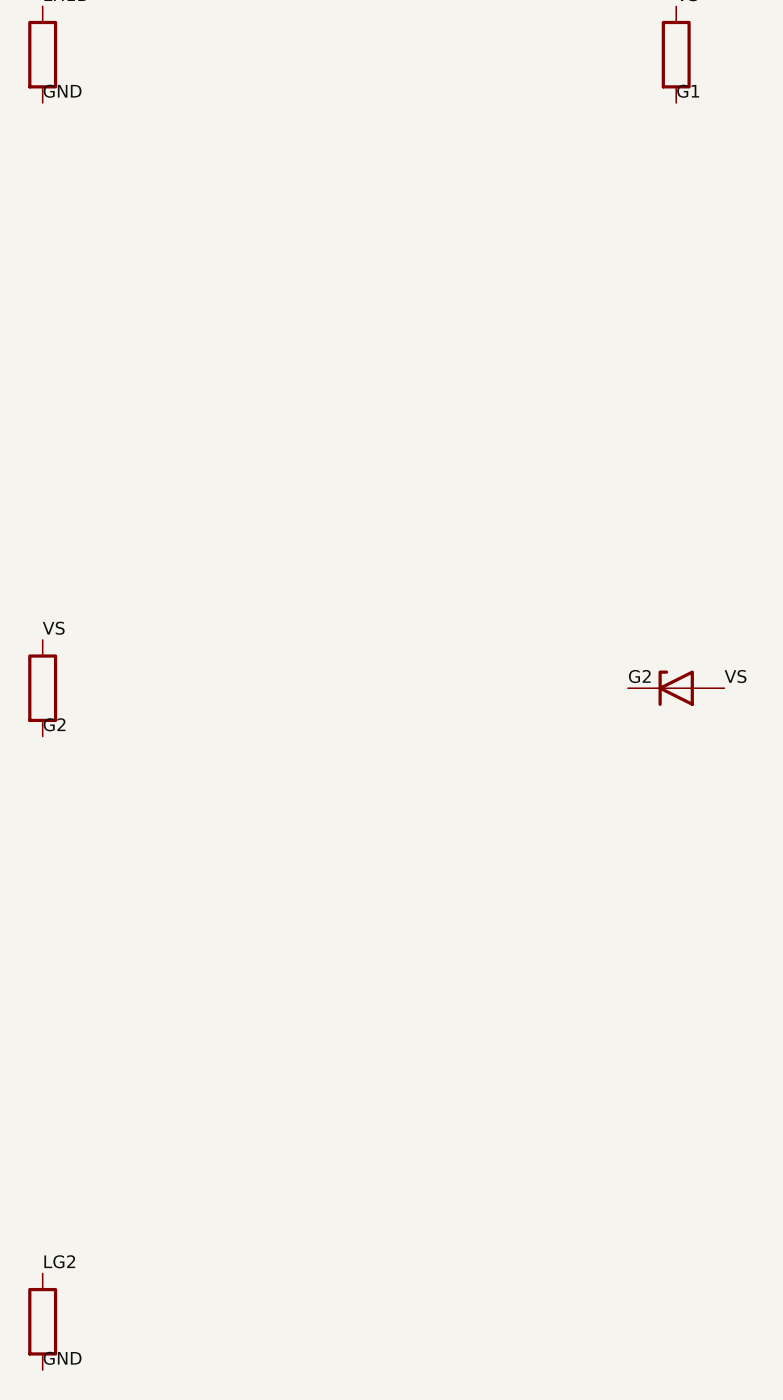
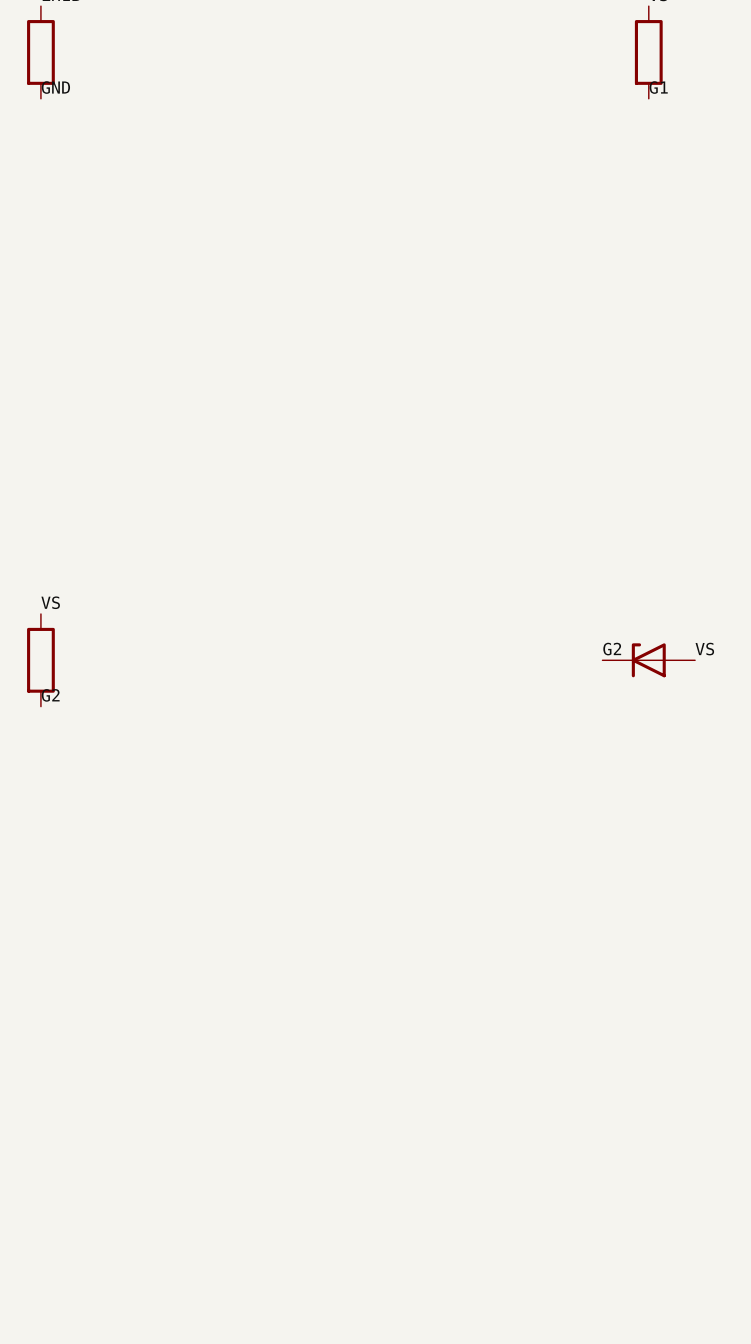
label: LG2 (59, 1261) -> none
part: (42, 1321) -> none
label: GND (62, 1358) -> none

